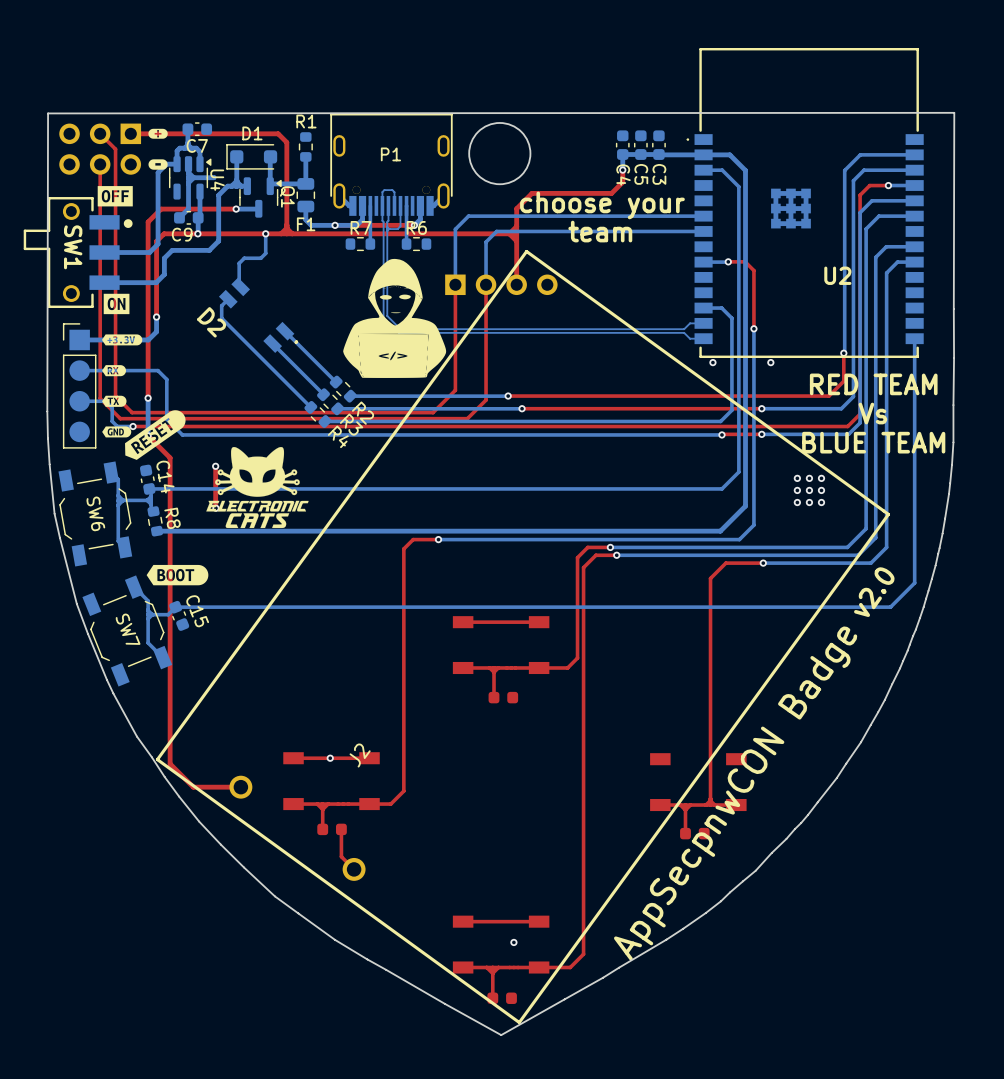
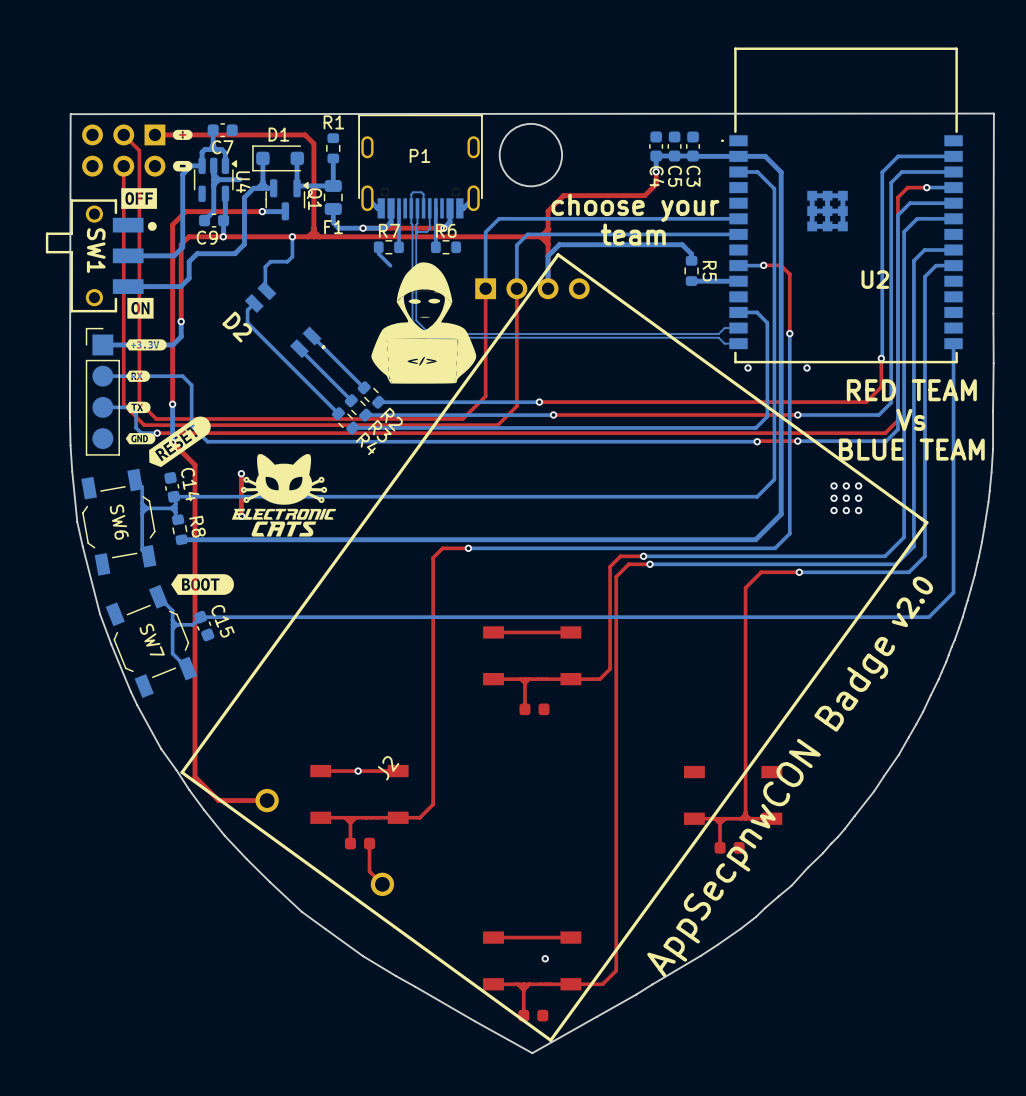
bottom track: none -> (378, 247) (378, 253) (390, 265)
bottom track: none -> (691, 260) (691, 254) (682, 244) (559, 244) (548, 256) (548, 288)
R5: none -> (691, 270)
bottom track: none -> (691, 281) (738, 281)

